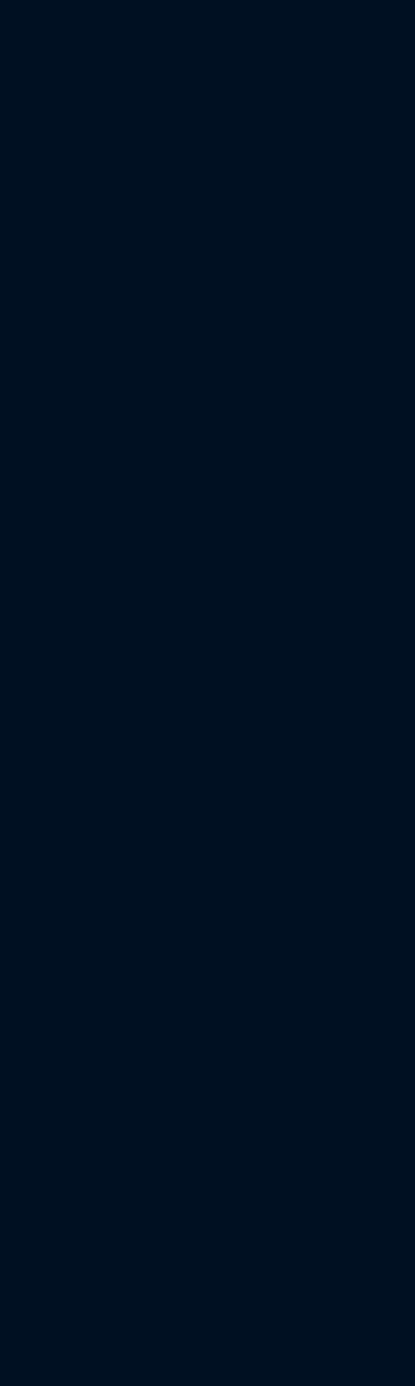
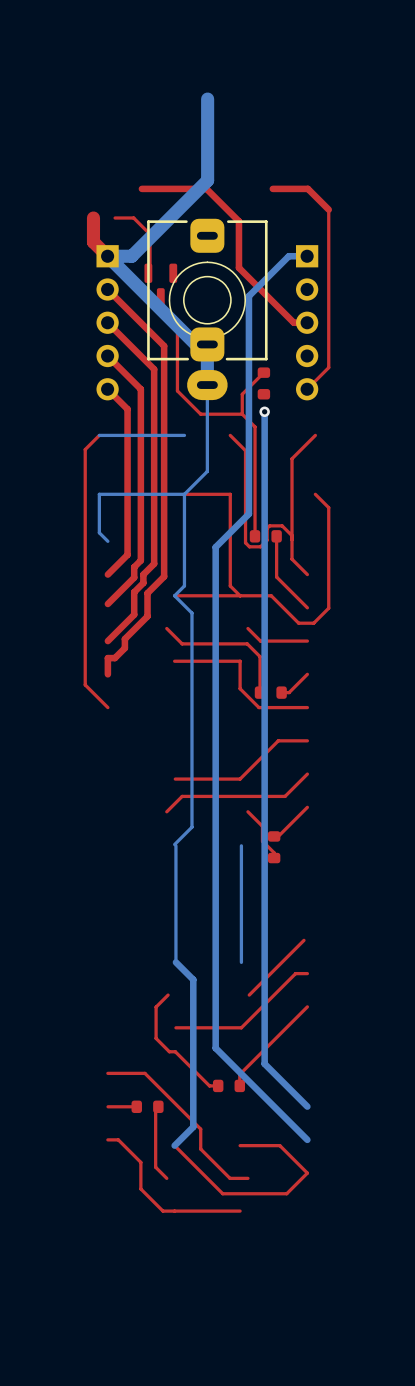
bottom track: none -> (207, 99) (207, 180) (131, 256) (107, 256) (207, 356) (207, 471) (184, 494)
top track: none -> (141, 188) (206, 188) (238, 221) (238, 267) (293, 322) (307, 322)
top track: none -> (272, 188) (307, 188) (328, 209) (328, 367) (307, 389)
top track: none -> (93, 218) (93, 242) (107, 256)
top track: none -> (115, 218) (133, 218) (150, 234) (150, 271)
bottom track: none -> (307, 256) (288, 256) (248, 296) (248, 513) (215, 547) (215, 1048) (307, 1139)
part: none -> (160, 285)
top track: none -> (107, 289) (164, 346) (164, 576) (147, 593) (147, 616) (124, 639) (124, 648) (114, 658) (107, 658) (107, 674)
top track: none -> (160, 303) (177, 320) (177, 390) (200, 414) (242, 414)
part: none -> (207, 309)
top track: none -> (107, 322) (154, 369) (154, 563) (143, 574) (143, 583) (134, 592) (134, 614) (107, 641)
part: none -> (107, 322)
part: none -> (307, 322)
top track: none -> (107, 356) (140, 389) (140, 560) (134, 567) (134, 577) (107, 603)
top track: none -> (263, 372) (242, 394) (242, 414)
part: none -> (263, 383)
top track: none -> (107, 389) (127, 409) (127, 554) (107, 574)
bottom track: none -> (264, 411) (264, 1063) (307, 1106)
via: none -> (264, 411)
top track: none -> (242, 414) (255, 426) (255, 536)
top track: none -> (99, 435) (85, 449) (85, 684) (107, 707)
bottom track: none -> (184, 435) (99, 435)
top track: none -> (230, 435) (245, 450) (245, 542) (249, 546) (260, 546) (267, 540) (267, 528) (269, 525) (282, 525) (292, 535)
top track: none -> (315, 435) (292, 458) (292, 559) (307, 574)
top track: none -> (184, 494) (230, 494) (230, 585) (240, 595)
bottom track: none -> (184, 494) (184, 585) (174, 595) (191, 613) (191, 827) (174, 844)
bottom track: none -> (184, 494) (99, 494) (99, 532) (107, 541)
top track: none -> (315, 494) (328, 507) (328, 608) (313, 623) (298, 623) (271, 595) (174, 595)
part: none -> (265, 536)
top track: none -> (276, 536) (276, 577) (307, 607)
top track: none -> (166, 628) (182, 643) (247, 643) (260, 656) (260, 692)
top track: none -> (247, 628) (260, 641) (307, 641)
top track: none -> (174, 661) (240, 661) (240, 688) (258, 707) (307, 707)
top track: none -> (307, 674) (289, 692) (281, 692)
part: none -> (270, 692)
top track: none -> (307, 740) (278, 740) (240, 779) (175, 779)
top track: none -> (307, 774) (285, 796) (182, 796) (166, 811)
top track: none -> (307, 807) (278, 836) (272, 836)
top track: none -> (247, 811) (262, 826) (262, 841) (274, 852) (274, 858)
bottom track: none -> (175, 845) (175, 962) (193, 979) (193, 1126) (174, 1145)
bottom track: none -> (241, 845) (241, 962)
part: none -> (274, 847)
top track: none -> (303, 940) (249, 995)
top track: none -> (307, 973) (295, 973) (241, 1027) (175, 1027)
top track: none -> (168, 995) (156, 1007) (156, 1038) (169, 1051) (175, 1051) (209, 1085) (218, 1085)
top track: none -> (307, 1006) (239, 1074) (239, 1085)
top track: none -> (107, 1073) (144, 1073) (200, 1129) (200, 1149) (229, 1178) (247, 1178)
part: none -> (228, 1085)
top track: none -> (136, 1106) (108, 1106)
part: none -> (147, 1106)
top track: none -> (155, 1109) (155, 1167) (166, 1178)
top track: none -> (107, 1139) (118, 1139) (140, 1162) (140, 1189) (162, 1211) (240, 1211)
top track: none -> (240, 1145) (279, 1145) (307, 1173) (286, 1193) (222, 1193) (174, 1145)

